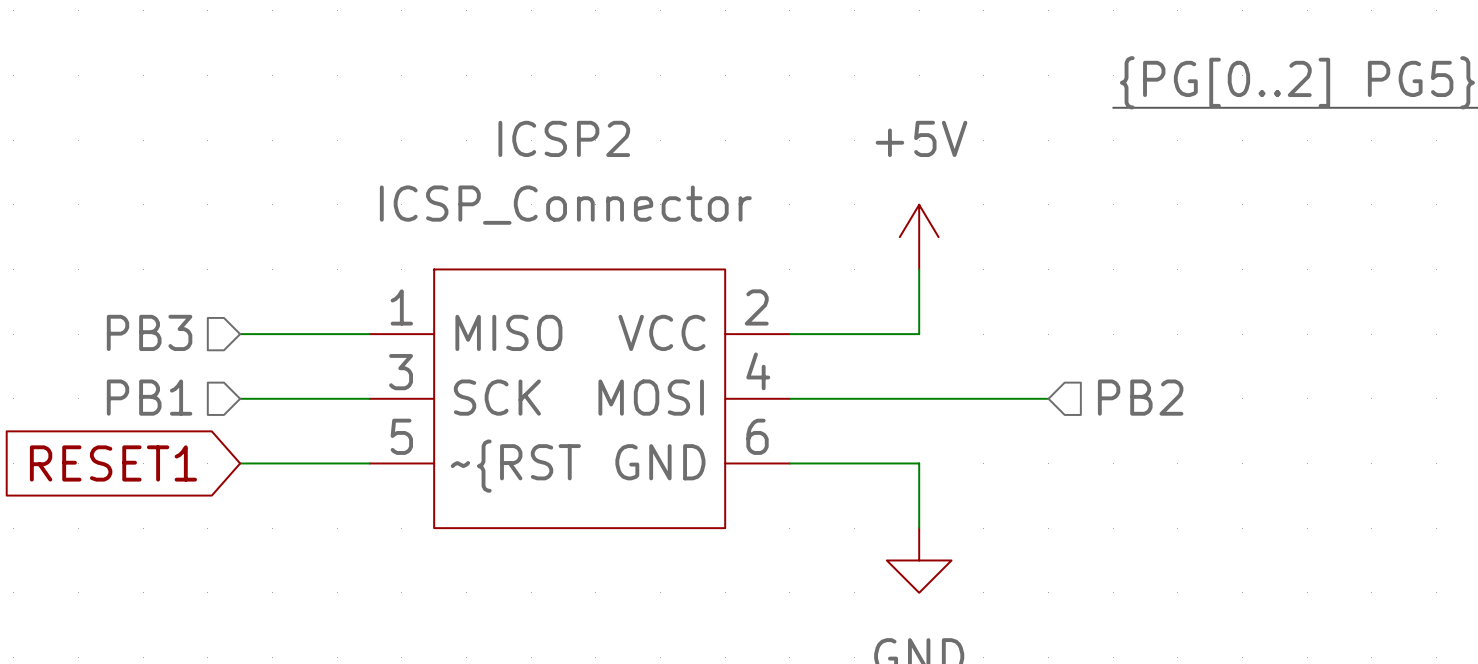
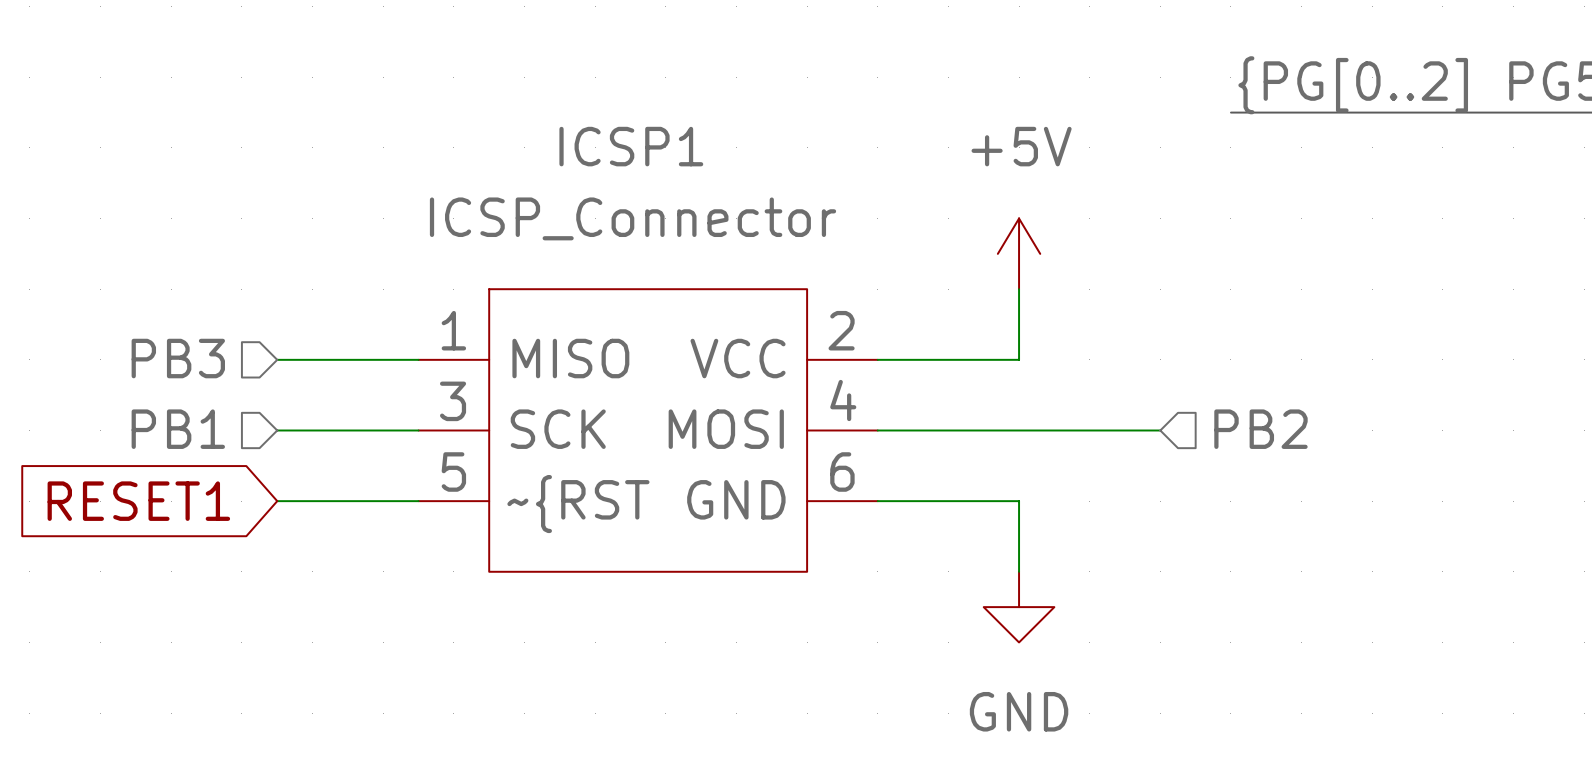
ICSP2 name: ICSP2 (564, 138) -> ICSP1 (631, 146)

